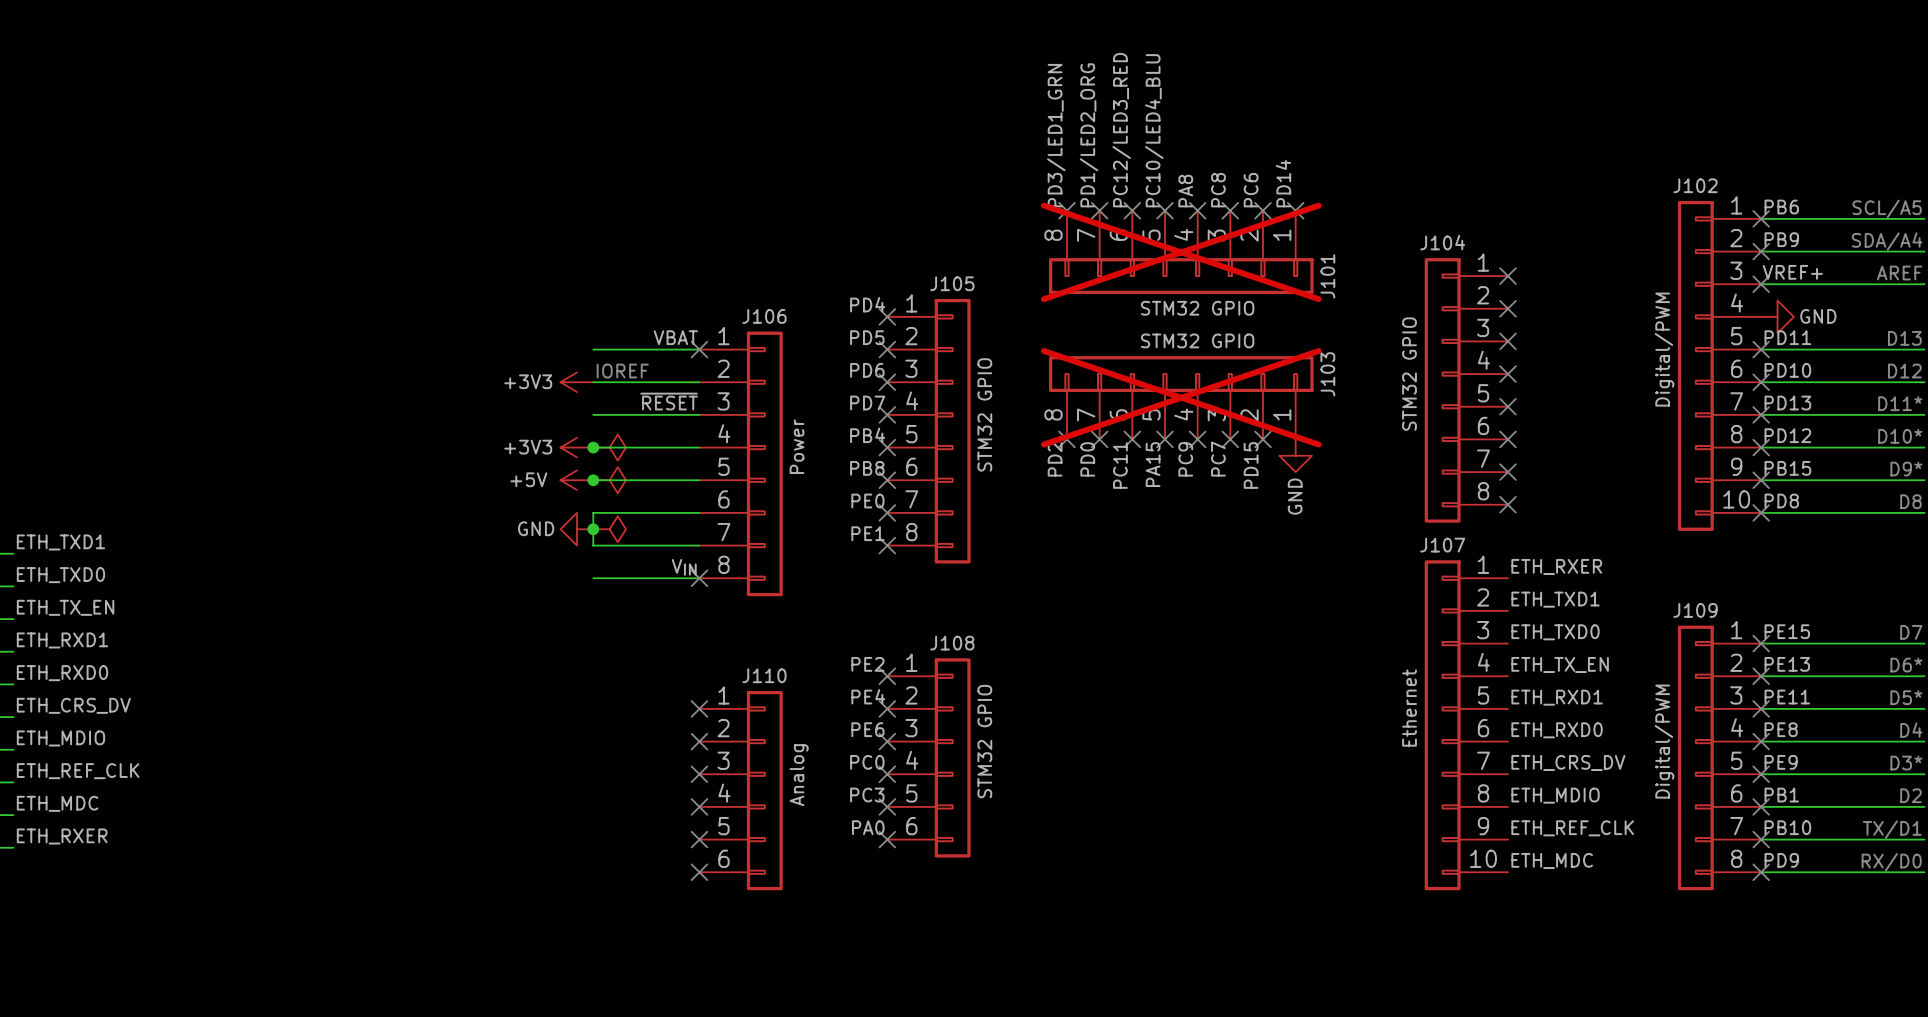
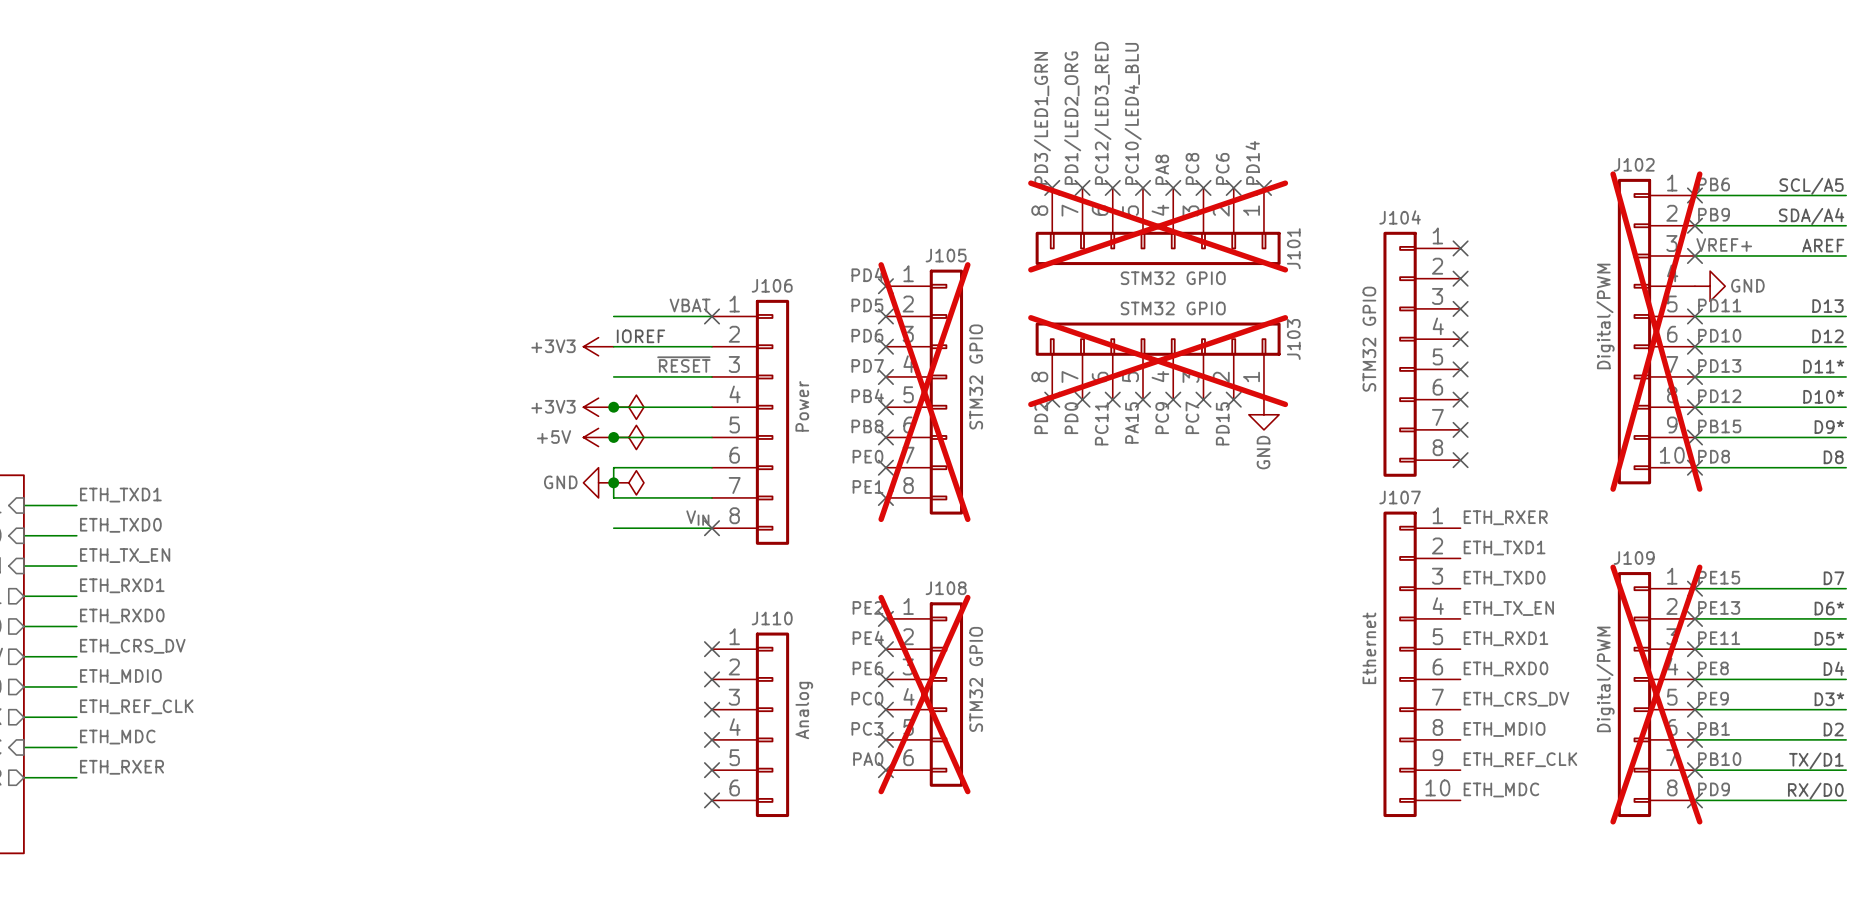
J102 do-not-place cross: none -> (1656, 331)
J105 do-not-place cross: none -> (924, 392)
J108 do-not-place cross: none -> (924, 694)
J109 do-not-place cross: none -> (1656, 694)

